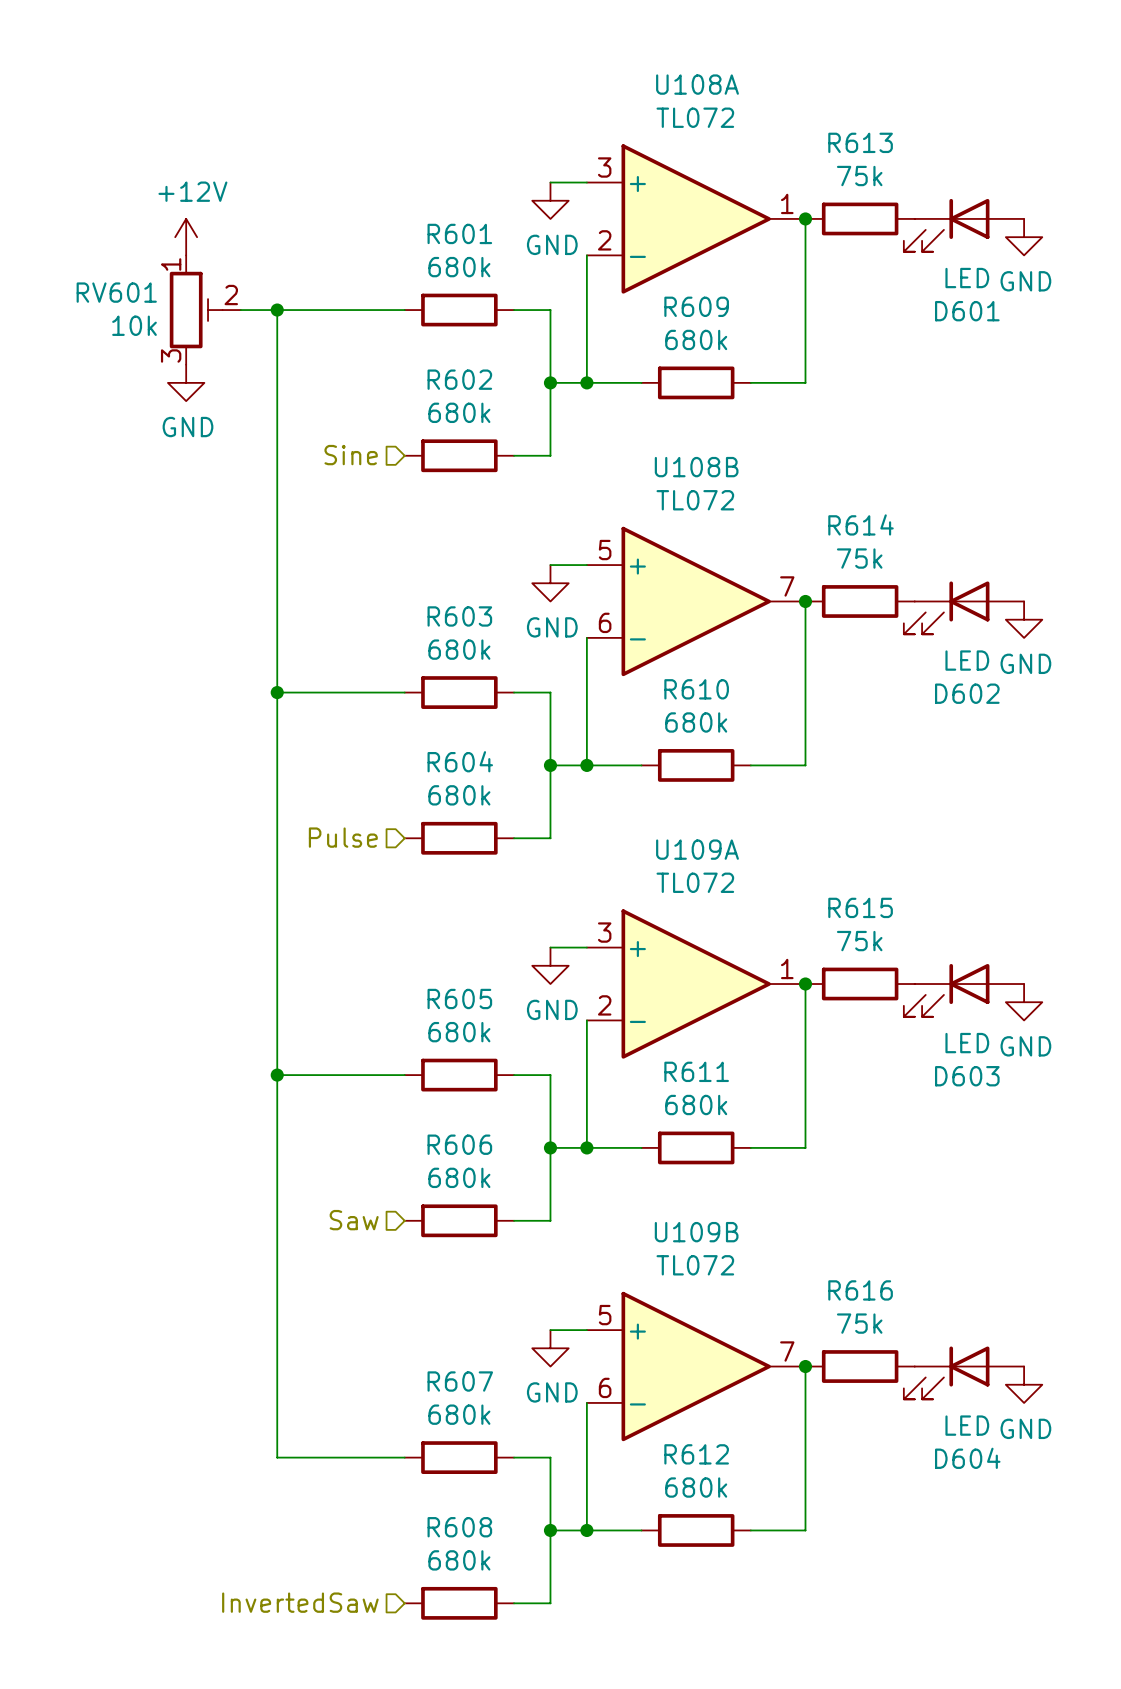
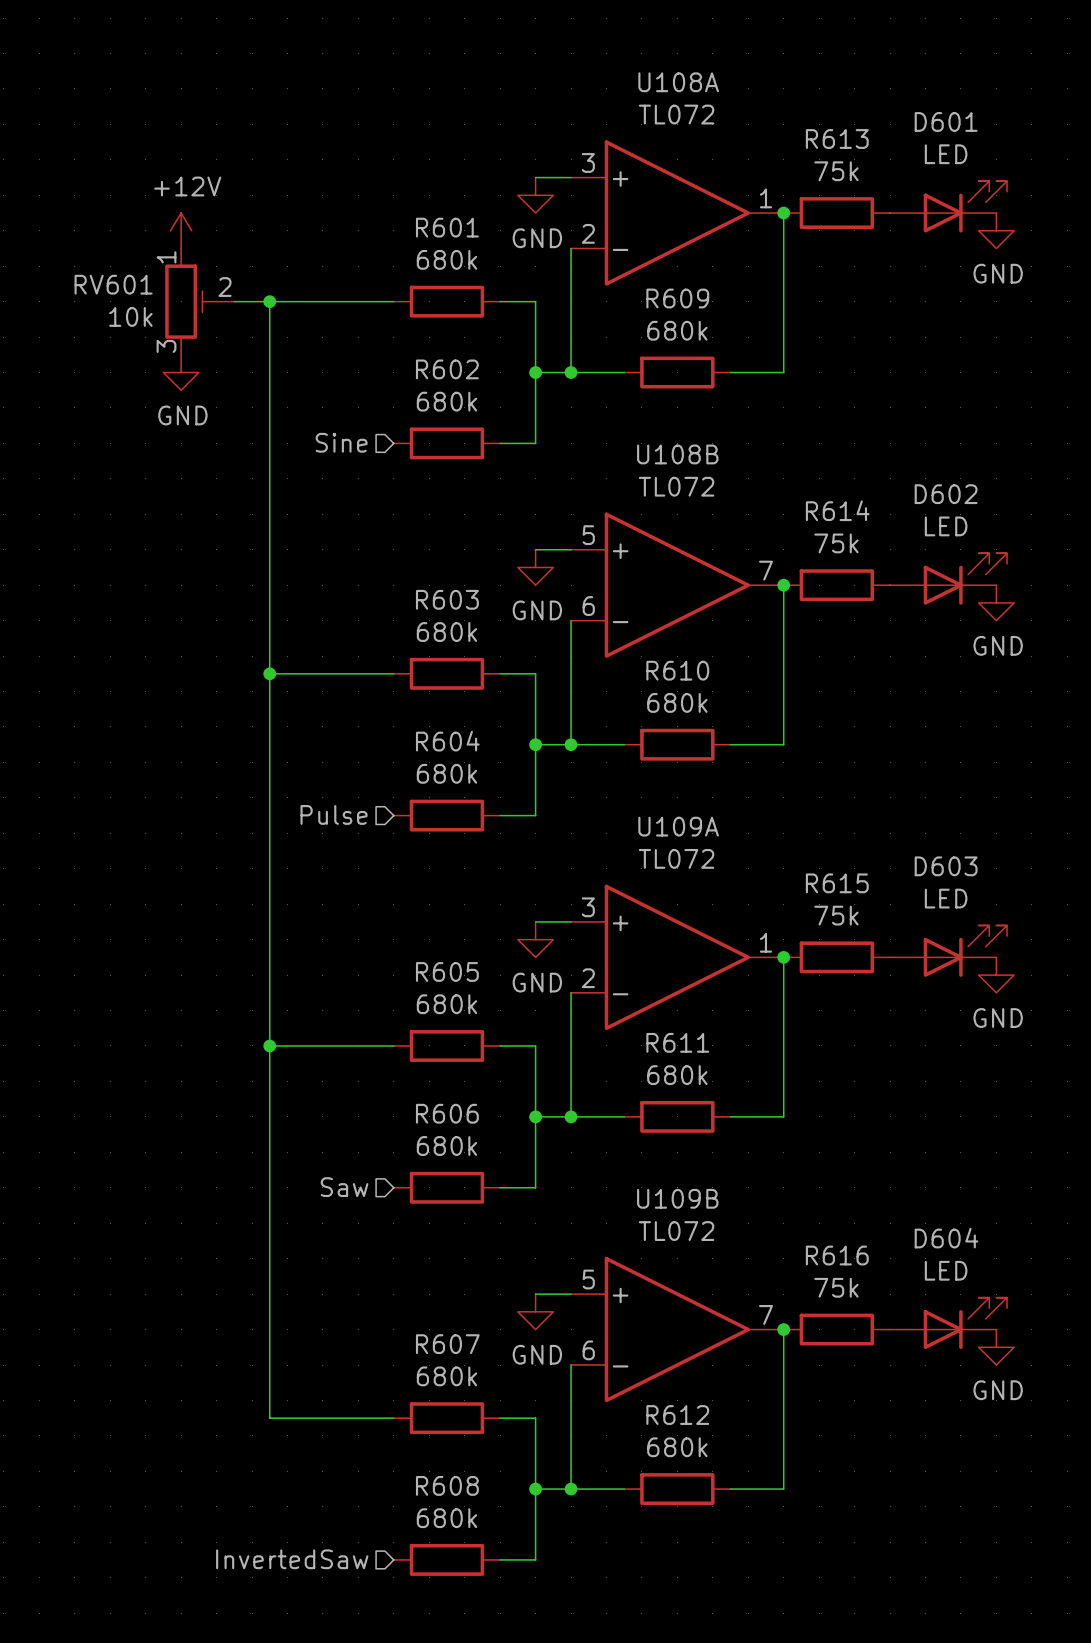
D601 rotation: 0° (946, 225) -> 180° (965, 206)
D602 rotation: 0° (946, 607) -> 180° (965, 579)
D603 rotation: 0° (946, 990) -> 180° (965, 951)
D604 rotation: 0° (946, 1372) -> 180° (965, 1323)

